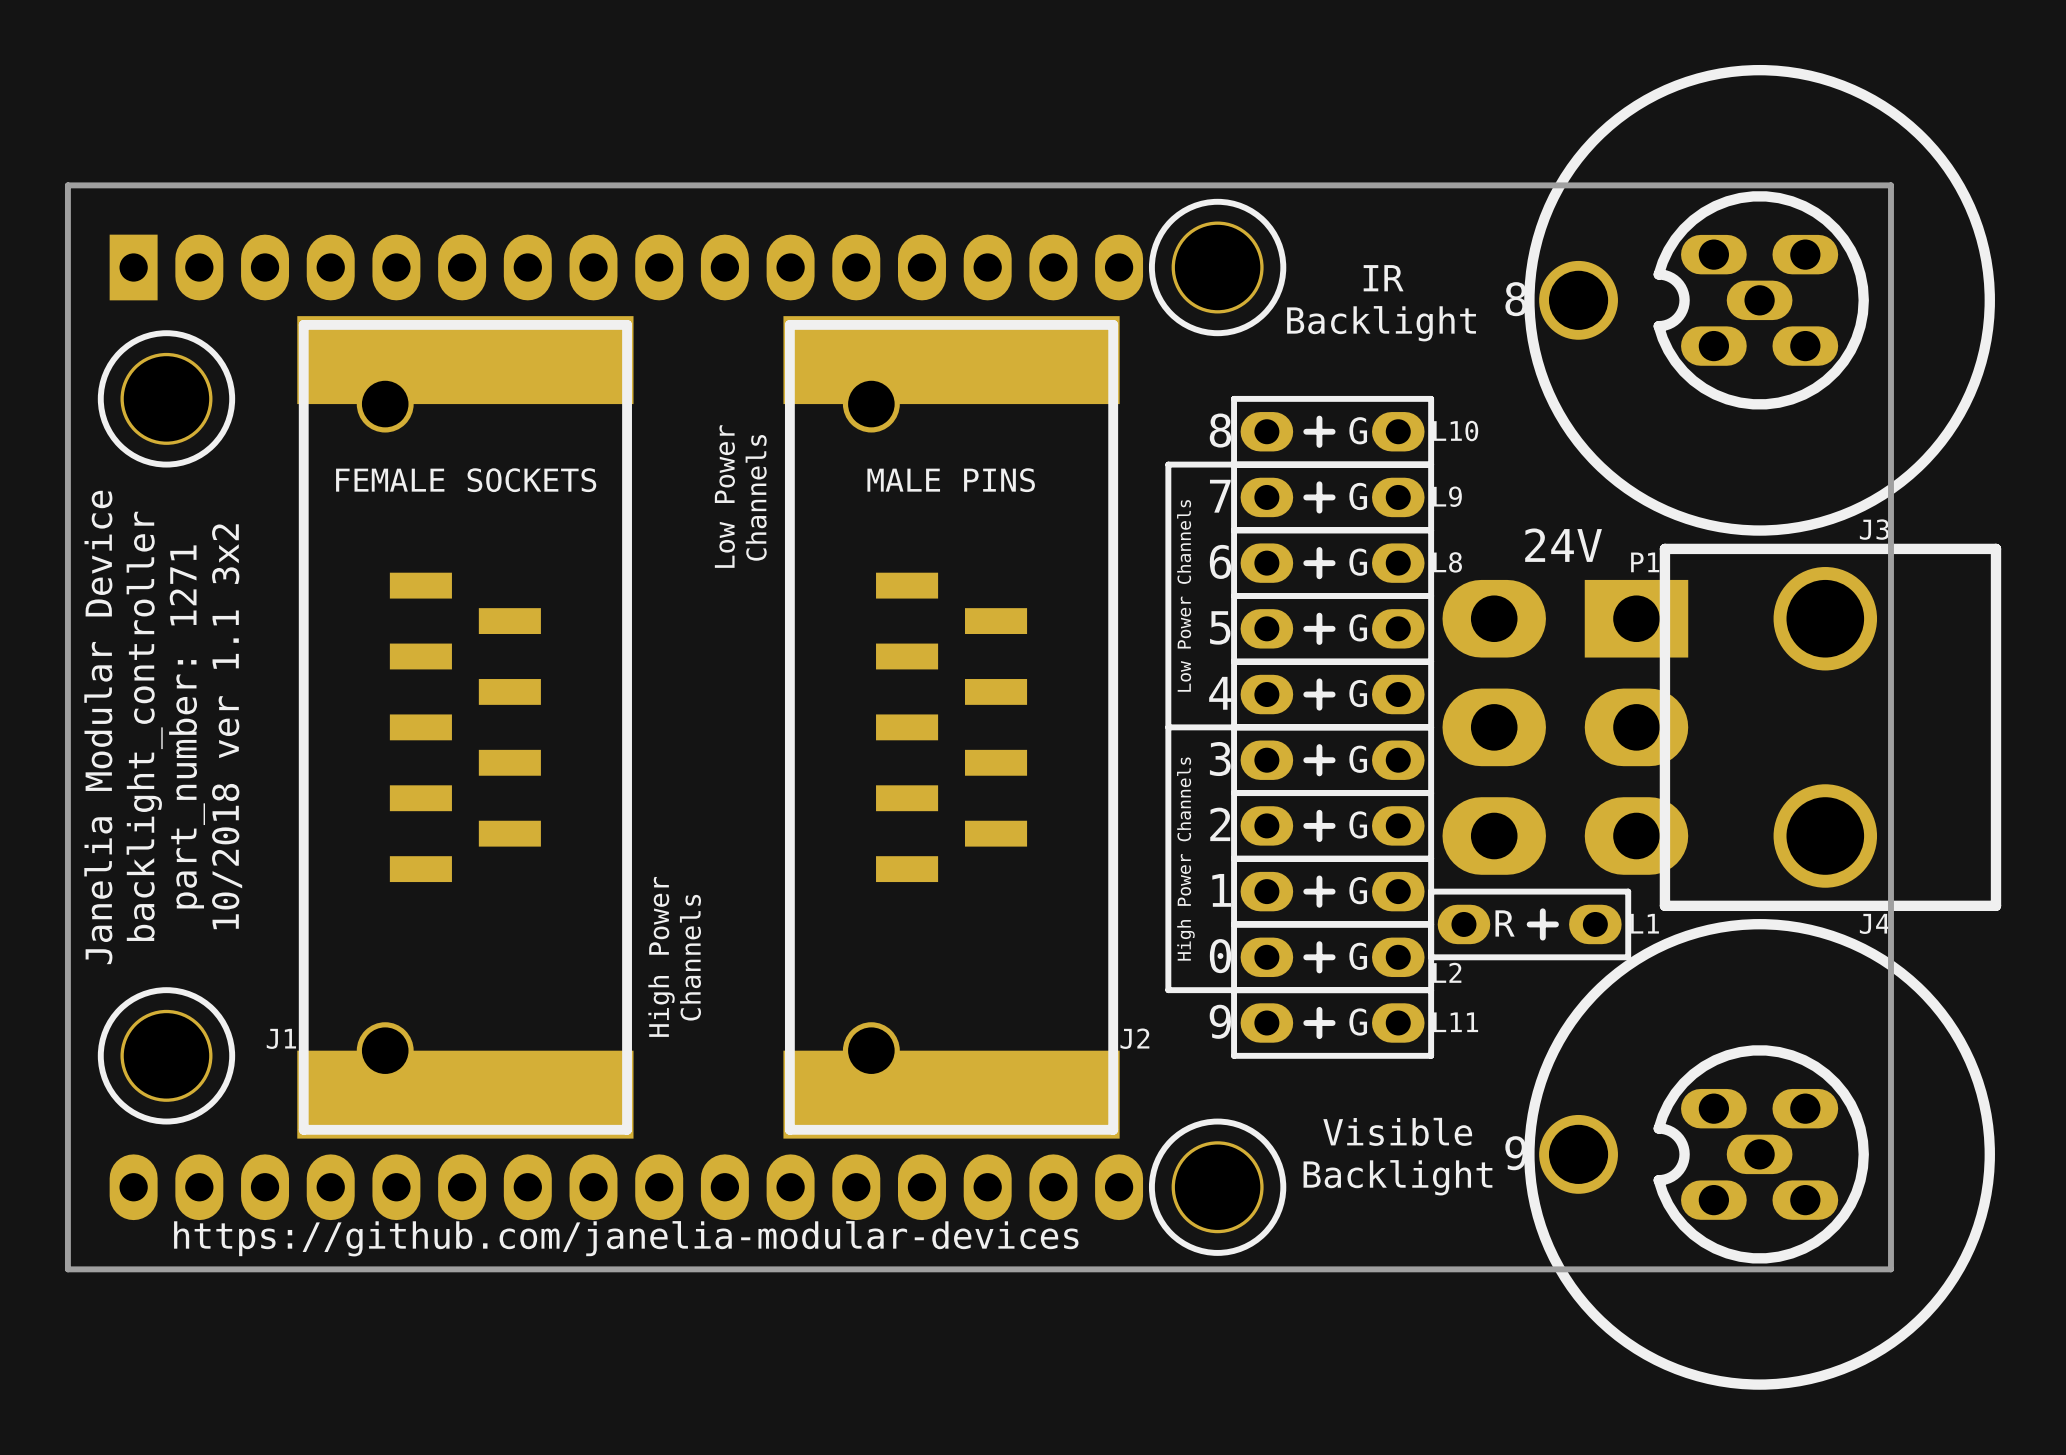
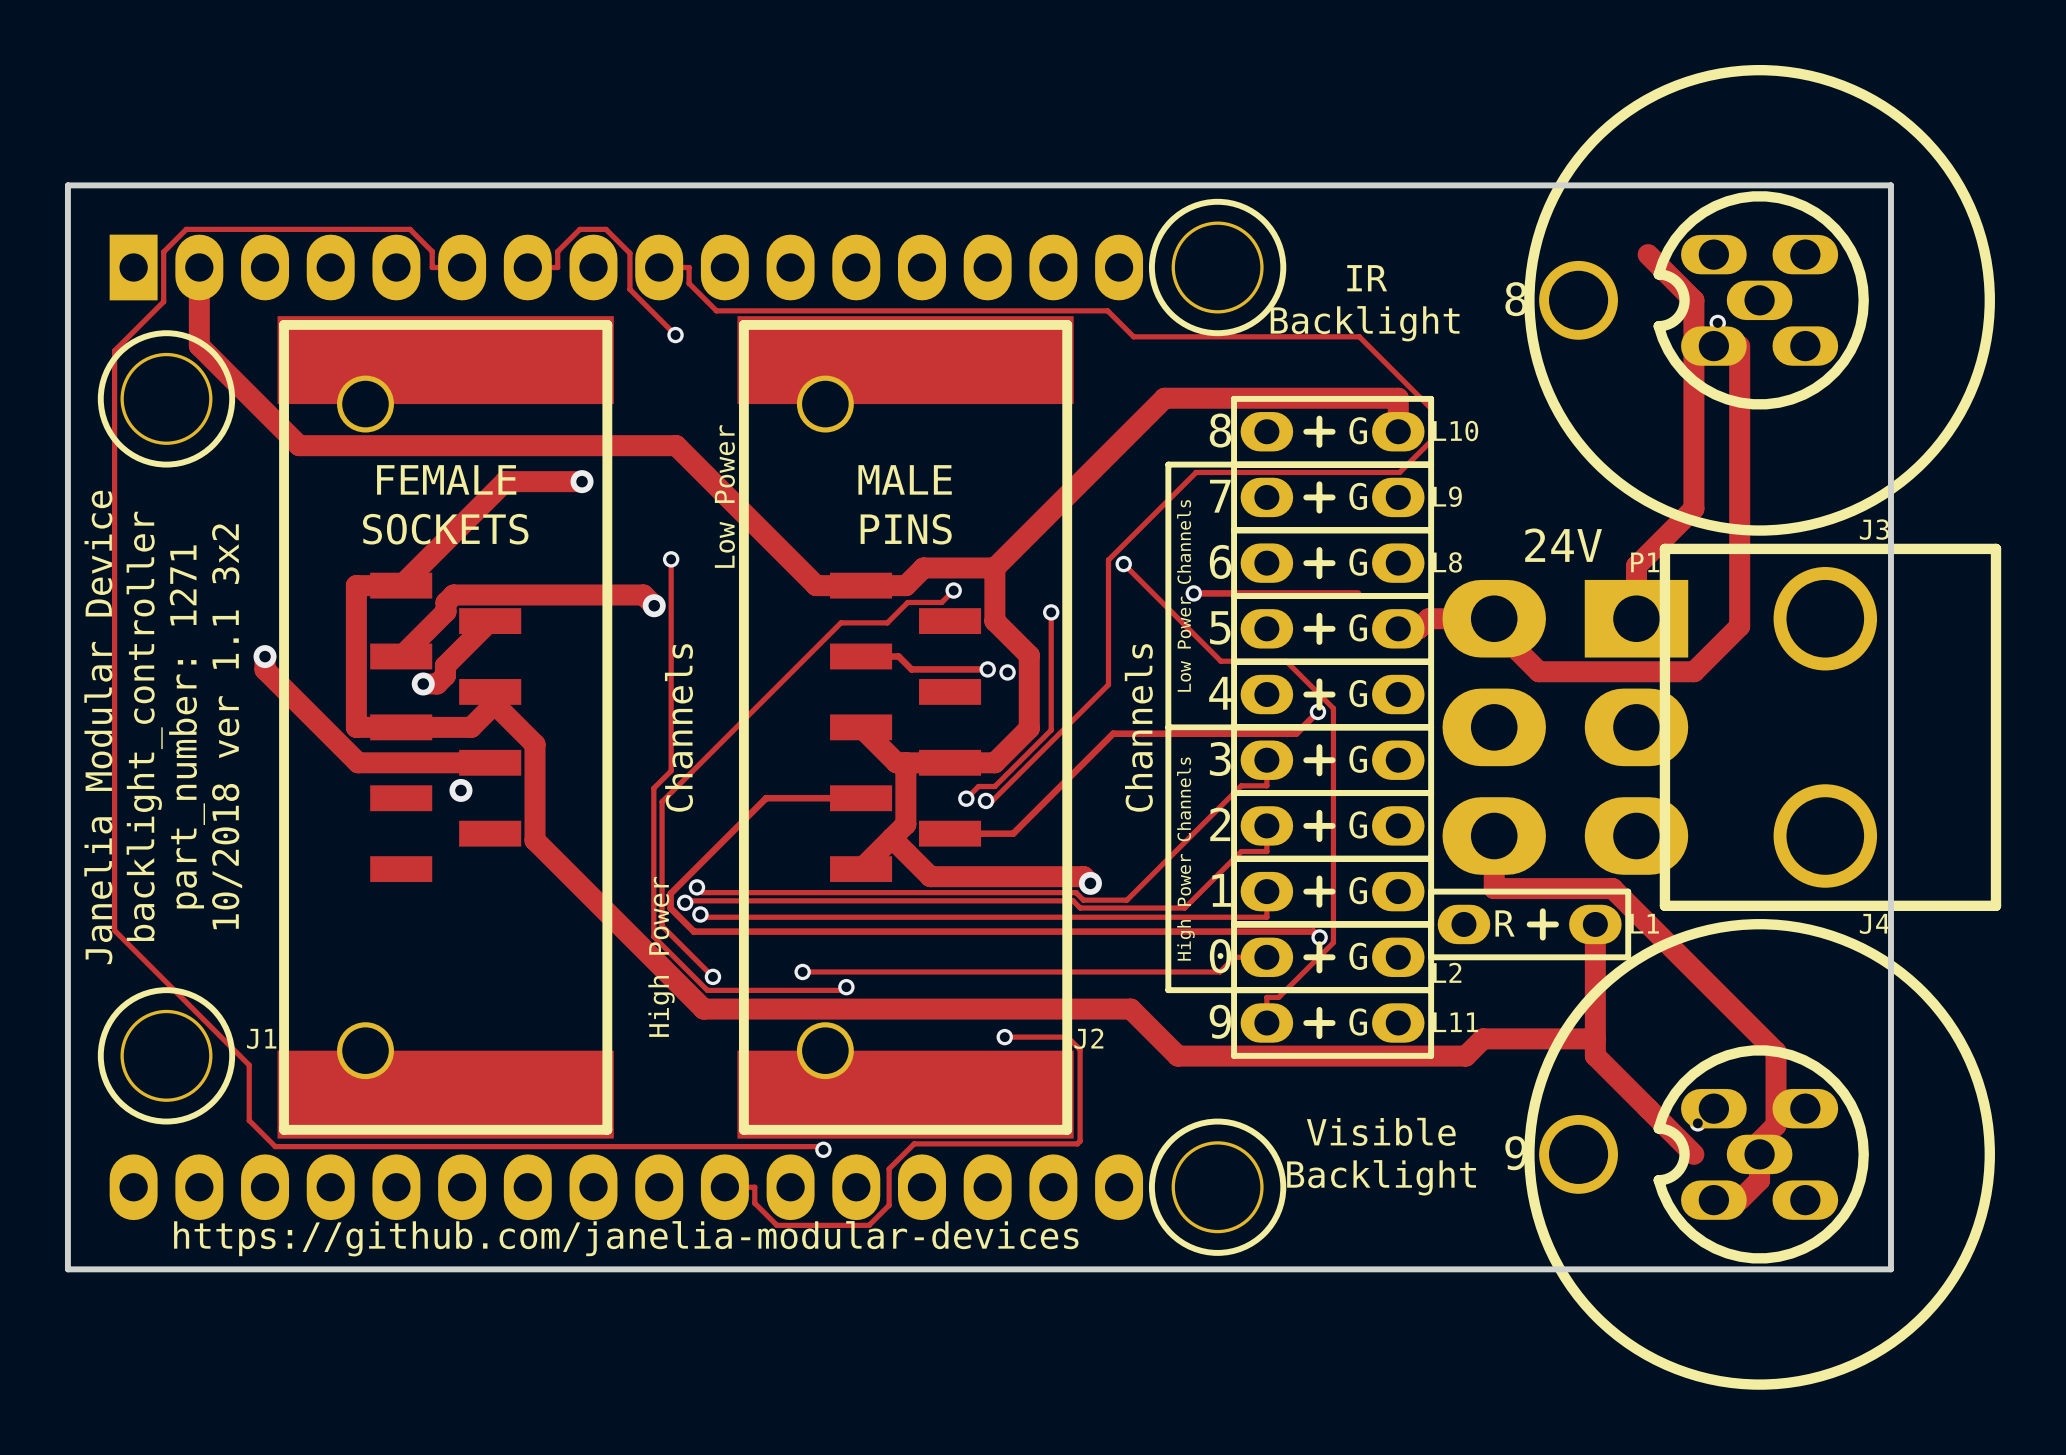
track: none -> (1648, 254) (1693, 300) (1693, 508) (1636, 566) (1636, 618)
track: none -> (199, 267) (199, 345) (299, 445) (676, 445) (816, 585) (905, 585) (923, 567) (994, 567)
track: none -> (462, 267) (432, 267) (432, 251) (410, 229) (186, 229) (163, 251) (163, 301) (114, 350) (114, 930) (249, 1065) (249, 1120) (275, 1146) (820, 1146) (823, 1149)
track: none -> (527, 267) (557, 267) (557, 251) (579, 229) (606, 229) (629, 253) (629, 289) (675, 335)
track: none -> (659, 267) (689, 267) (689, 283) (716, 310) (1107, 310) (1133, 336) (1359, 336) (1430, 408) (1430, 441) (1399, 472) (1196, 472) (1108, 560) (1108, 684) (992, 800) (985, 800)
text position: IR (1383, 278) -> IR (1367, 278)
via: none -> (1717, 322)
text position: Backlight (1381, 323) -> Backlight (1365, 323)
via: none -> (675, 335)
track: none -> (1739, 346) (1739, 626) (1694, 671) (1538, 671) (1494, 627) (1494, 618) (1428, 618) (1418, 628) (1398, 628)
track: none -> (1398, 431) (1398, 398) (1164, 398) (994, 567)
J1 text: FEMALE SOCKETS (466, 480) -> FEMALE (446, 479)
J2 text: MALE PINS (951, 480) -> MALE (905, 479)
track: none -> (582, 481) (505, 481) (401, 585) (356, 585) (356, 727) (471, 727) (490, 708)
via: none -> (582, 481)
text: Channels (756, 497) -> none
J1 text: none -> SOCKETS (445, 529)
J2 text: none -> PINS (906, 529)
track: none -> (671, 559) (671, 770) (653, 788) (653, 936) (707, 990) (843, 990) (846, 987)
via: none -> (671, 559)
track: none -> (1123, 564) (1220, 661) (1286, 661) (1333, 708) (1333, 942) (1278, 997) (1266, 997) (1266, 1023)
via: none -> (1123, 564)
track: none -> (994, 567) (994, 621) (1029, 655) (1029, 728) (994, 762) (896, 762) (861, 727)
track: none -> (953, 590) (941, 602) (907, 602) (887, 622) (840, 622) (662, 801) (662, 926) (712, 976)
via: none -> (953, 590)
track: none -> (1193, 593) (1357, 593)
via: none -> (1193, 593)
track: none -> (654, 605) (643, 594) (453, 594) (445, 602) (445, 611) (401, 656)
via: none -> (654, 605)
track: none -> (1051, 612) (1051, 730) (994, 786) (978, 786) (966, 798)
via: none -> (1051, 612)
track: none -> (490, 621) (445, 665) (445, 675) (437, 683) (423, 683)
track: none -> (265, 656) (265, 669) (358, 762) (490, 762)
via: none -> (265, 656)
track: none -> (861, 656) (898, 656) (911, 669) (987, 669)
via: none -> (987, 669)
via: none -> (1007, 672)
via: none -> (423, 683)
track: none -> (490, 708) (498, 708) (535, 744) (535, 840) (703, 1009) (1130, 1009) (1177, 1056) (1465, 1056) (1483, 1038) (1595, 1038)
track: none -> (1317, 711) (1296, 733) (1113, 733) (1013, 833) (950, 833)
via: none -> (1317, 711)
J1 position: (465, 727) -> (445, 727)
text: none -> Channels (678, 727)
J2 position: (951, 727) -> (905, 727)
text: none -> Channels (1138, 727)
track: none -> (1266, 760) (1266, 785) (1241, 785) (1126, 900) (1083, 900) (1075, 892) (702, 892) (696, 887)
track: none -> (905, 762) (905, 824) (861, 869)
via: none -> (460, 790)
track: none -> (861, 798) (766, 798) (670, 893) (670, 908) (693, 931) (1313, 931) (1319, 937)
via: none -> (966, 798)
via: none -> (985, 800)
track: none -> (1266, 825) (1266, 851) (1241, 851) (1184, 908) (1080, 908) (1073, 900) (687, 900) (685, 902)
track: none -> (1494, 836) (1494, 888) (1612, 888) (1776, 1051) (1776, 1125) (1759, 1141) (1759, 1180) (1739, 1200)
track: none -> (891, 838) (930, 876) (1083, 876) (1090, 883)
via: none -> (1090, 883)
via: none -> (696, 887)
track: none -> (1266, 891) (1266, 917) (703, 917) (700, 914)
via: none -> (685, 902)
via: none -> (700, 914)
track: none -> (1595, 924) (1595, 1055) (1693, 1154)
via: none -> (1319, 937)
text: Channels (690, 957) -> none
track: none -> (1266, 957) (1234, 957) (1220, 971) (802, 971)
via: none -> (802, 971)
via: none -> (712, 976)
via: none -> (846, 987)
track: none -> (1004, 1037) (1067, 1037) (1080, 1049) (1080, 1141) (1077, 1143) (914, 1143) (889, 1168) (889, 1205) (869, 1225) (776, 1225) (754, 1203) (754, 1187) (724, 1187)
via: none -> (1004, 1037)
via: none -> (1697, 1123)
text position: Visible (1397, 1131) -> Visible (1381, 1131)
via: none -> (823, 1149)
text position: Backlight (1397, 1177) -> Backlight (1381, 1177)

